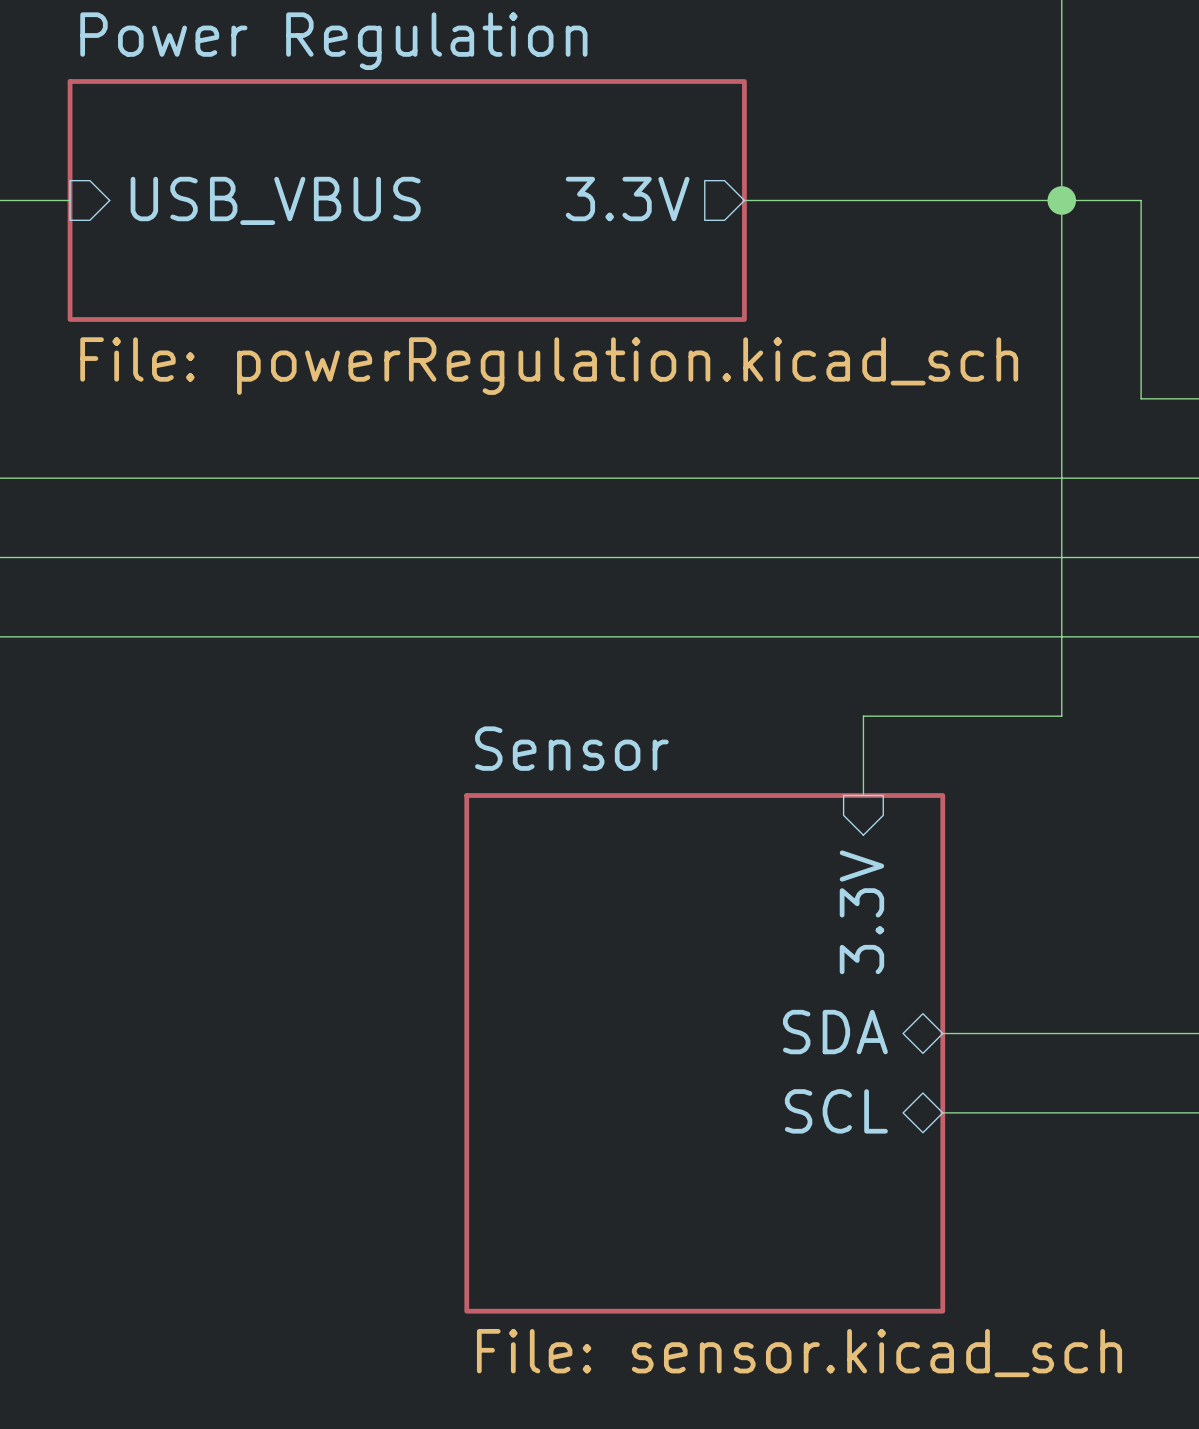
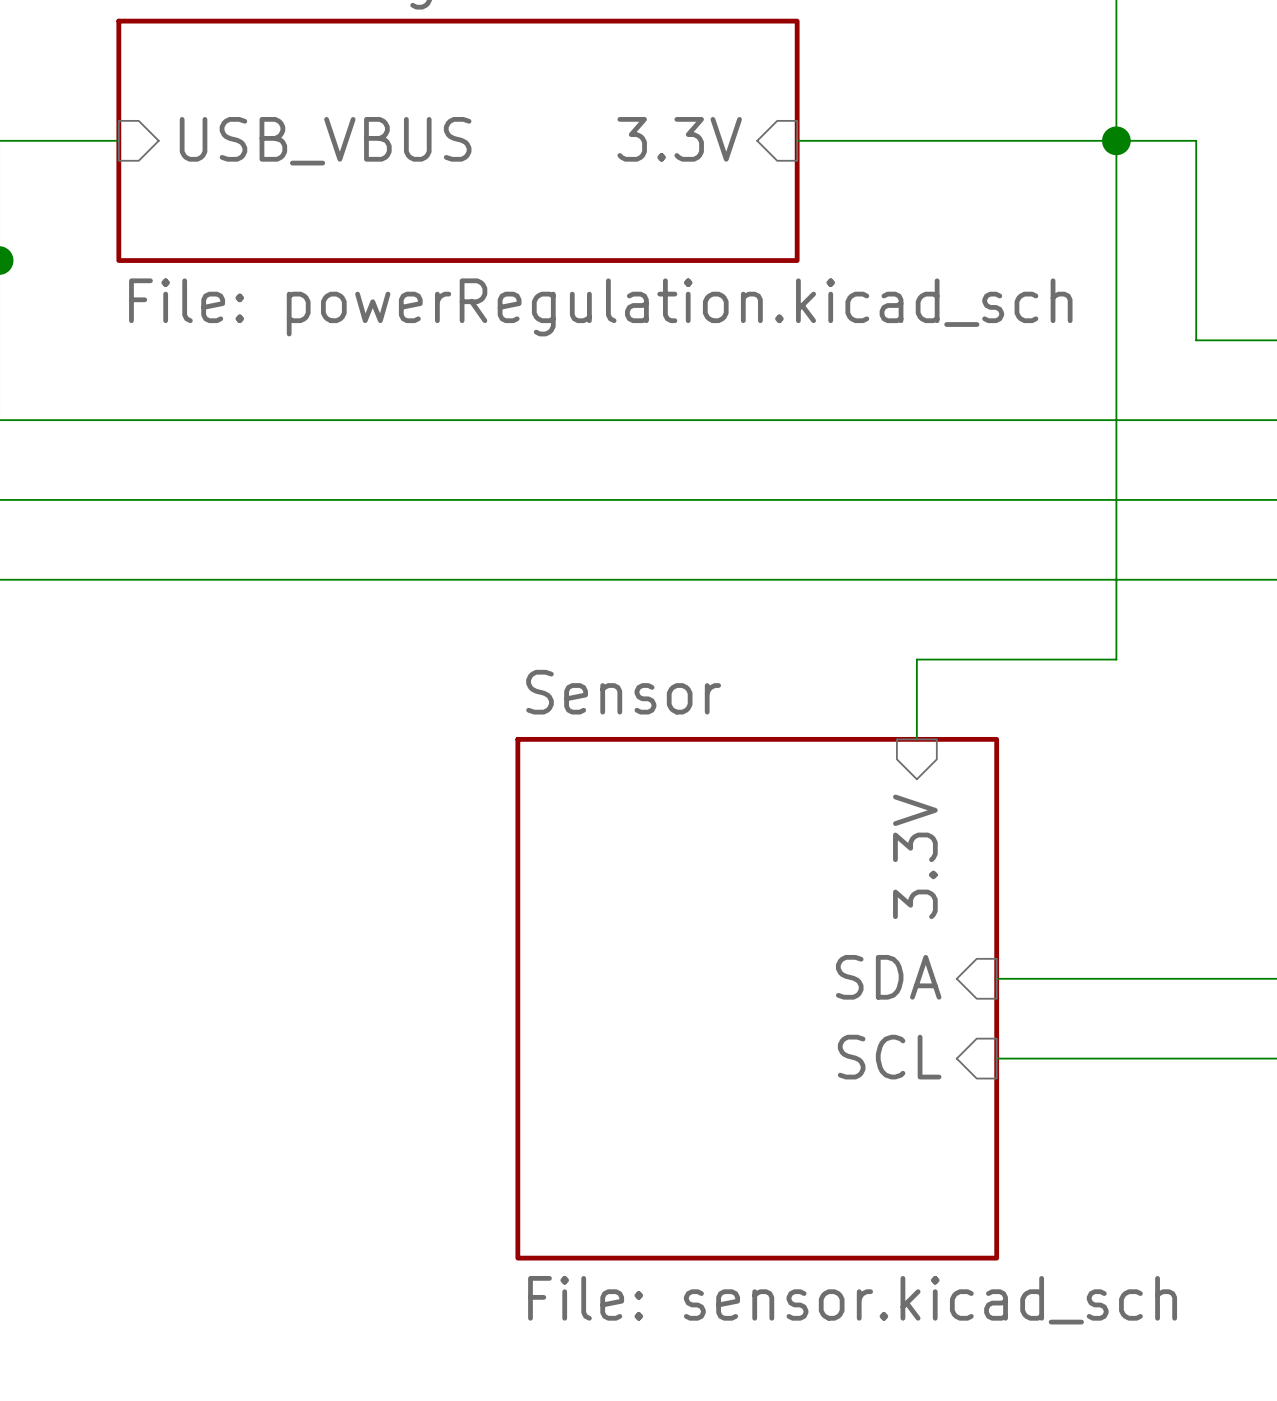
sheet pin shape: output (627, 199) -> input (679, 139)
sheet pin shape: bidirectional (835, 1032) -> input (888, 977)
sheet pin shape: bidirectional (836, 1111) -> input (889, 1057)

